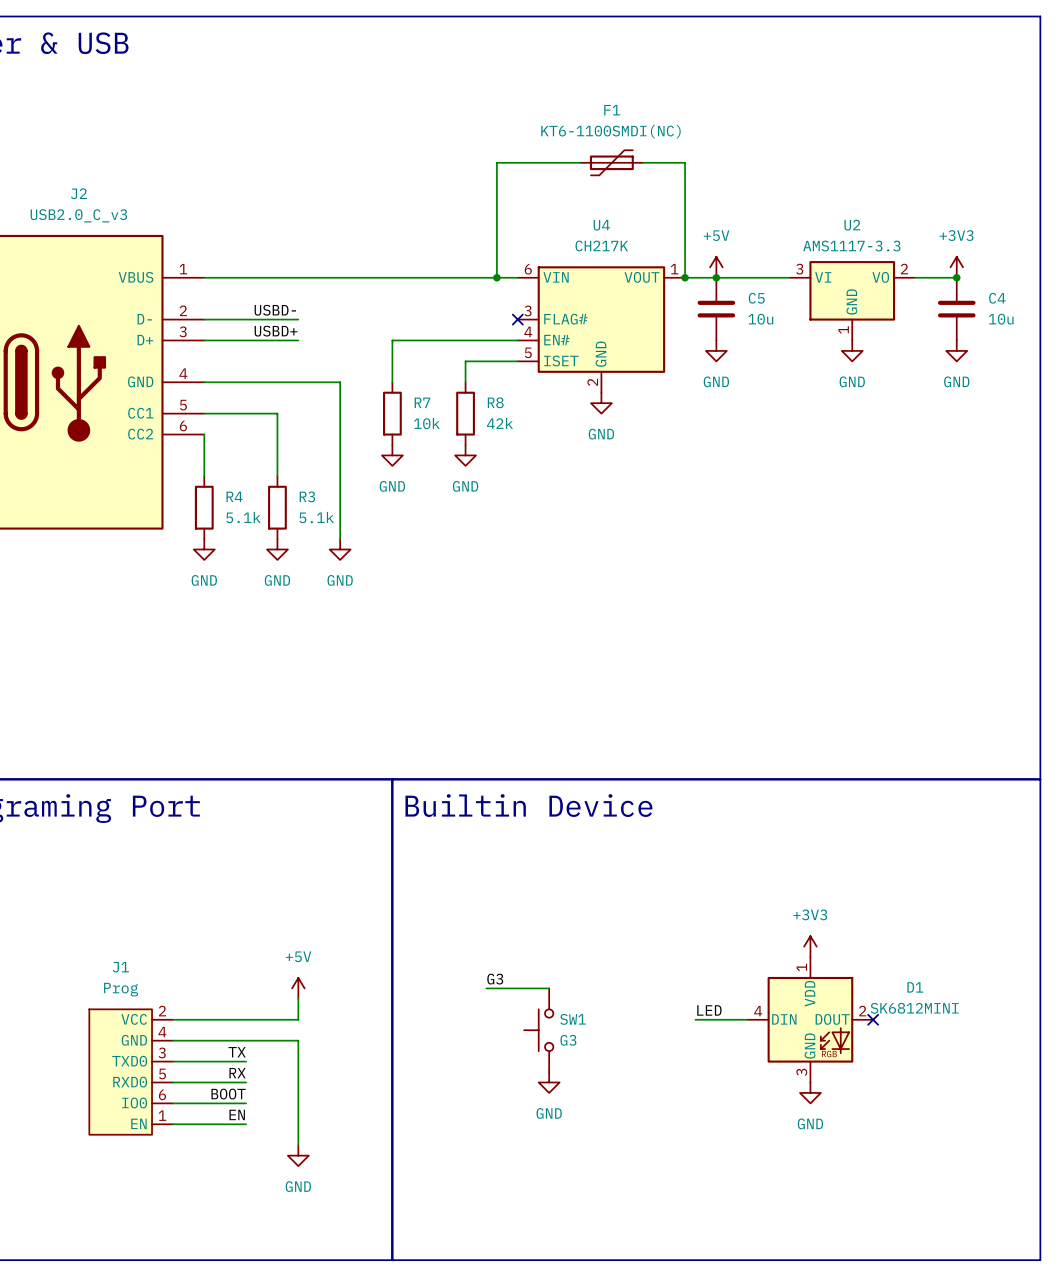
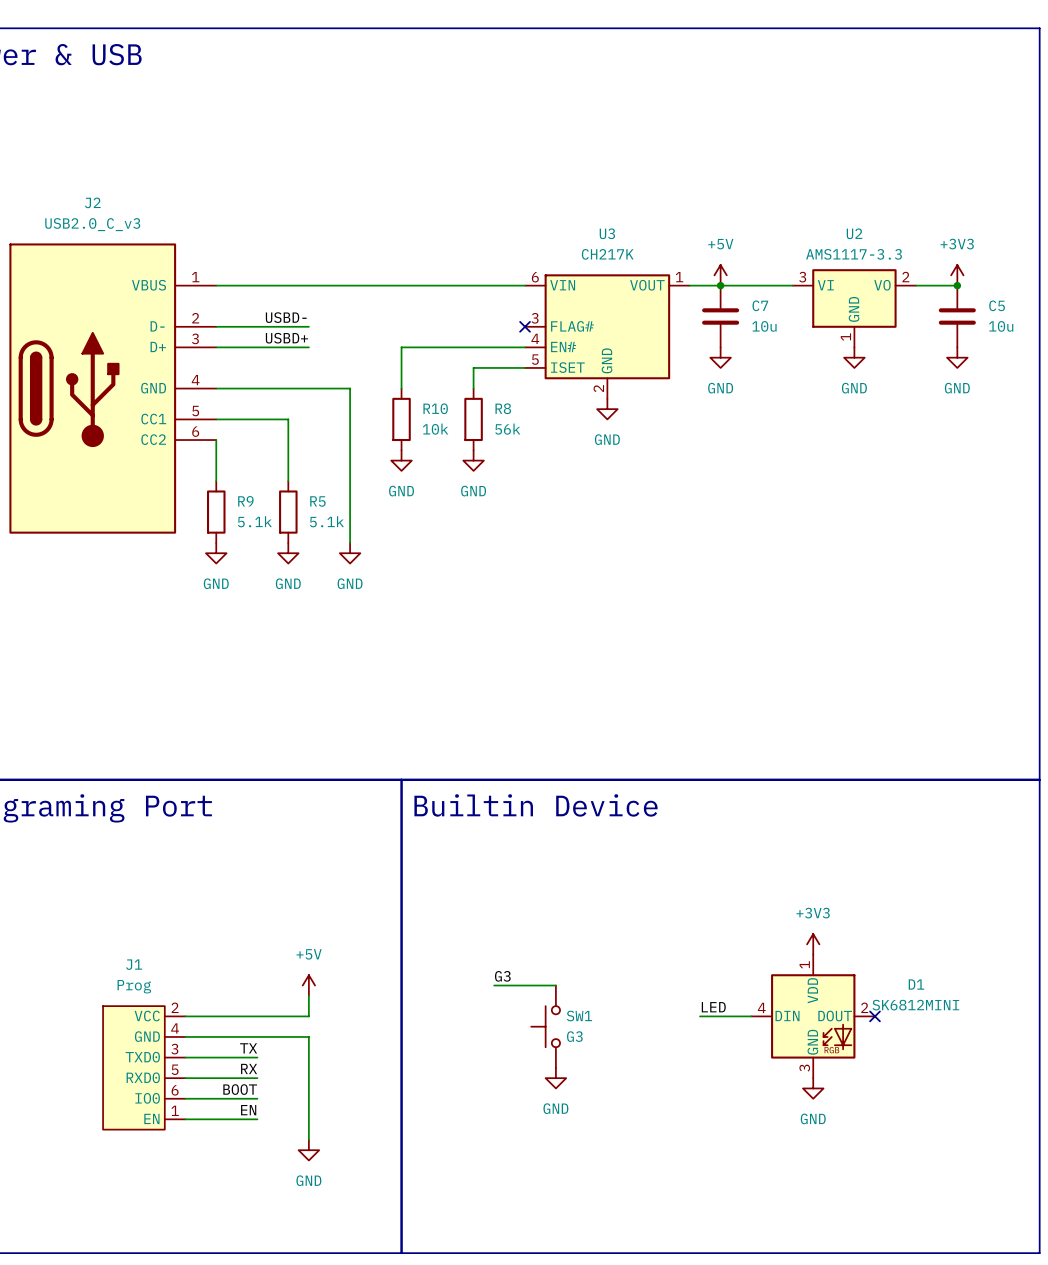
wire: (580, 162) (496, 162) (496, 277) -> none
F1: KT6-1100SMDI(NC) (611, 162) -> none
wire: (643, 162) (685, 162) (685, 277) -> none
U4 name: U4 (601, 225) -> U3 (607, 233)
junction: (496, 277) -> none
junction: (685, 277) -> none
C5 name: C5 (756, 298) -> C7 (760, 305)
C4 name: C4 (997, 298) -> C5 (997, 305)
R7 name: R7 (422, 402) -> R10 (435, 408)
R8 value: 42k (500, 423) -> 56k (507, 429)
R4 name: R4 (234, 496) -> R9 (245, 501)
R3 name: R3 (307, 496) -> R5 (317, 501)

